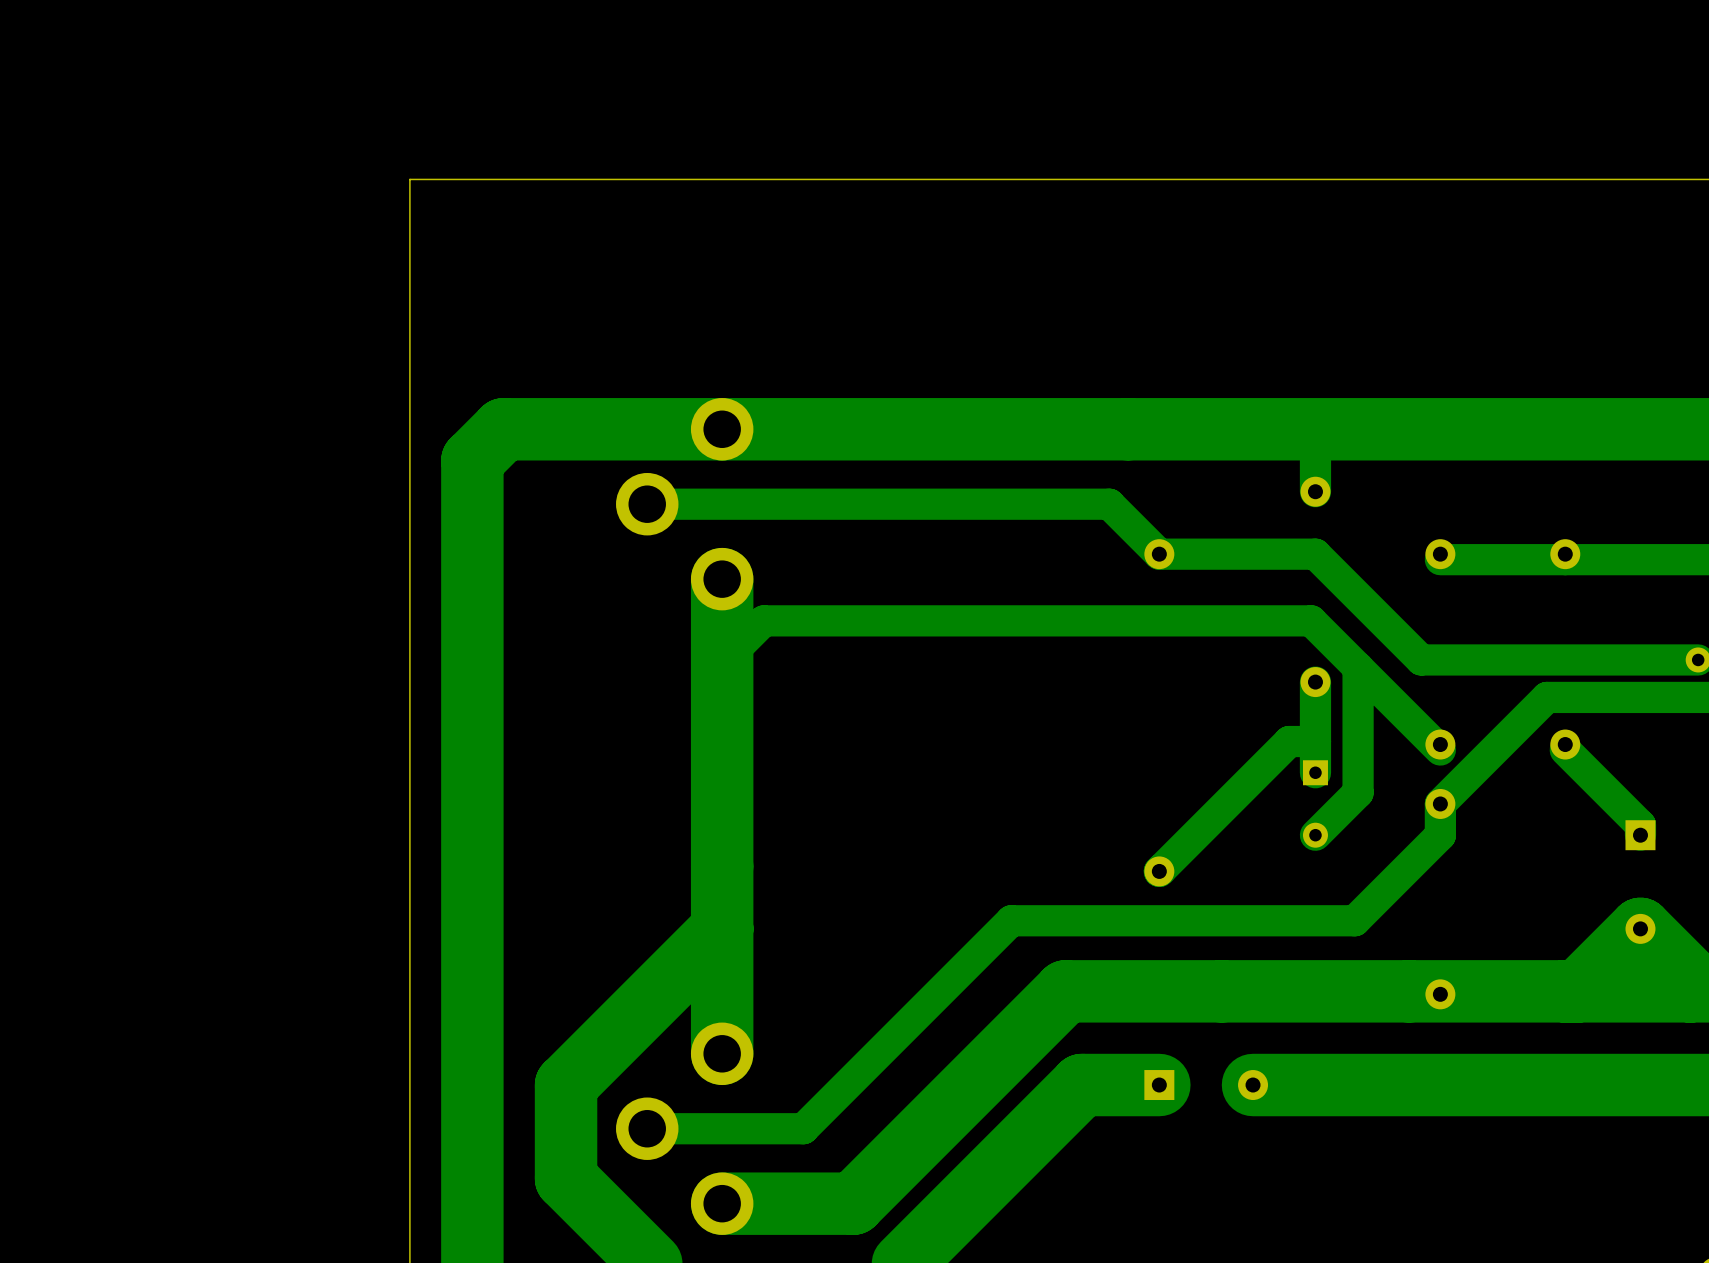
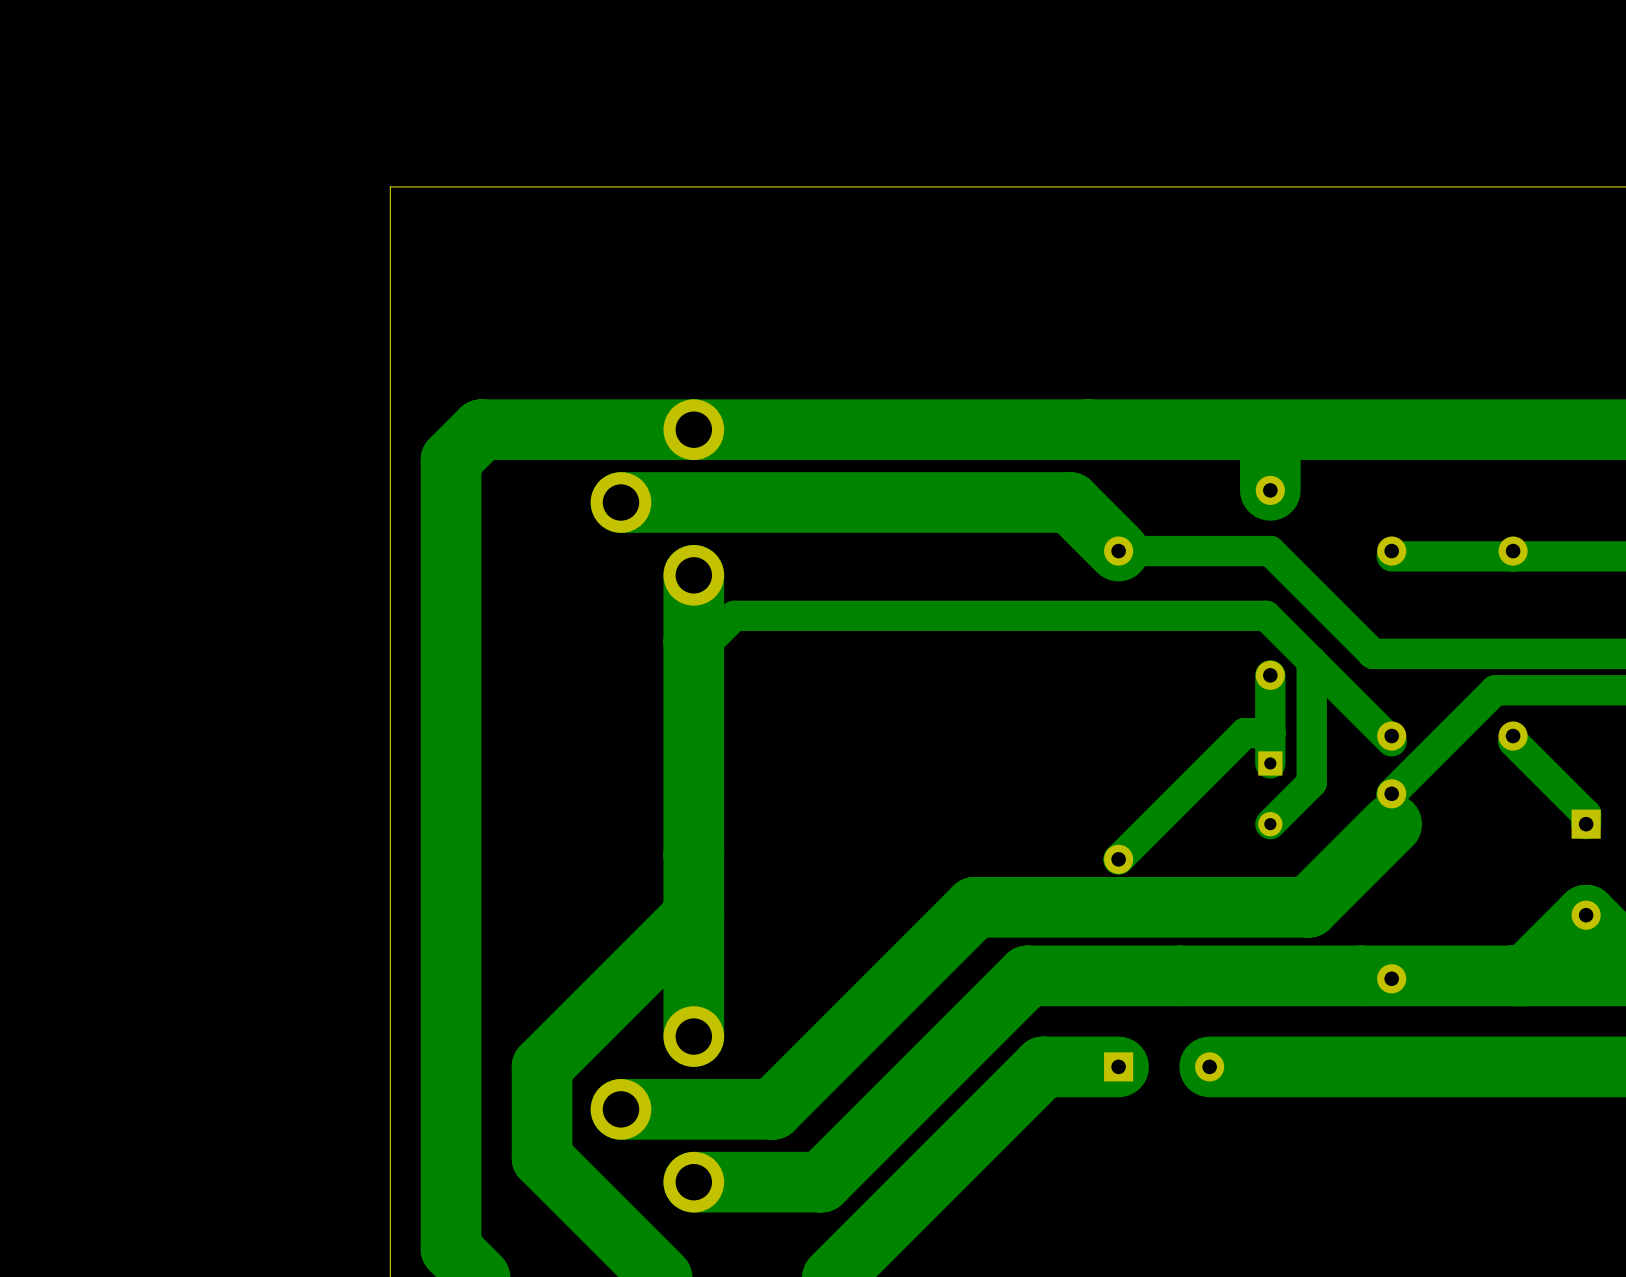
bottom track width: thin (1315, 460) (1315, 491) -> thick (1270, 460) (1270, 490)
bottom track width: thin (647, 504) (1109, 504) (1159, 554) -> thick (620, 502) (1070, 502) (1118, 551)
bottom track width: thin (1440, 835) (1354, 920) (1011, 920) (803, 1128) (647, 1128) -> thick (1391, 824) (1308, 907) (974, 907) (772, 1109) (620, 1109)

